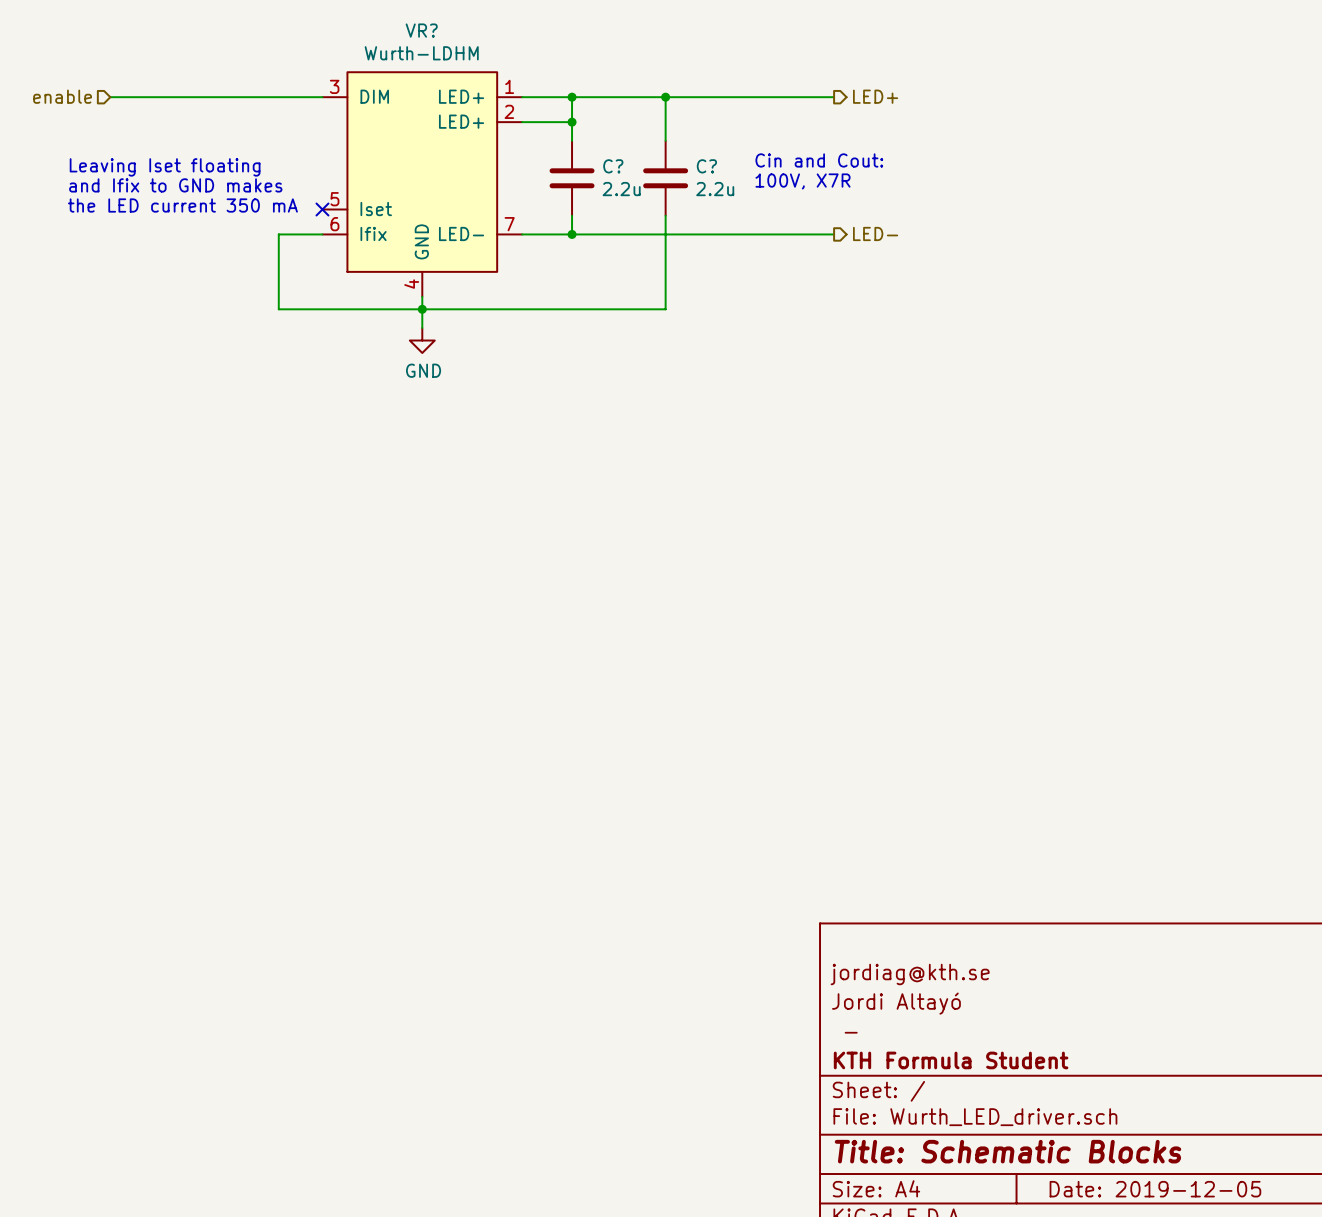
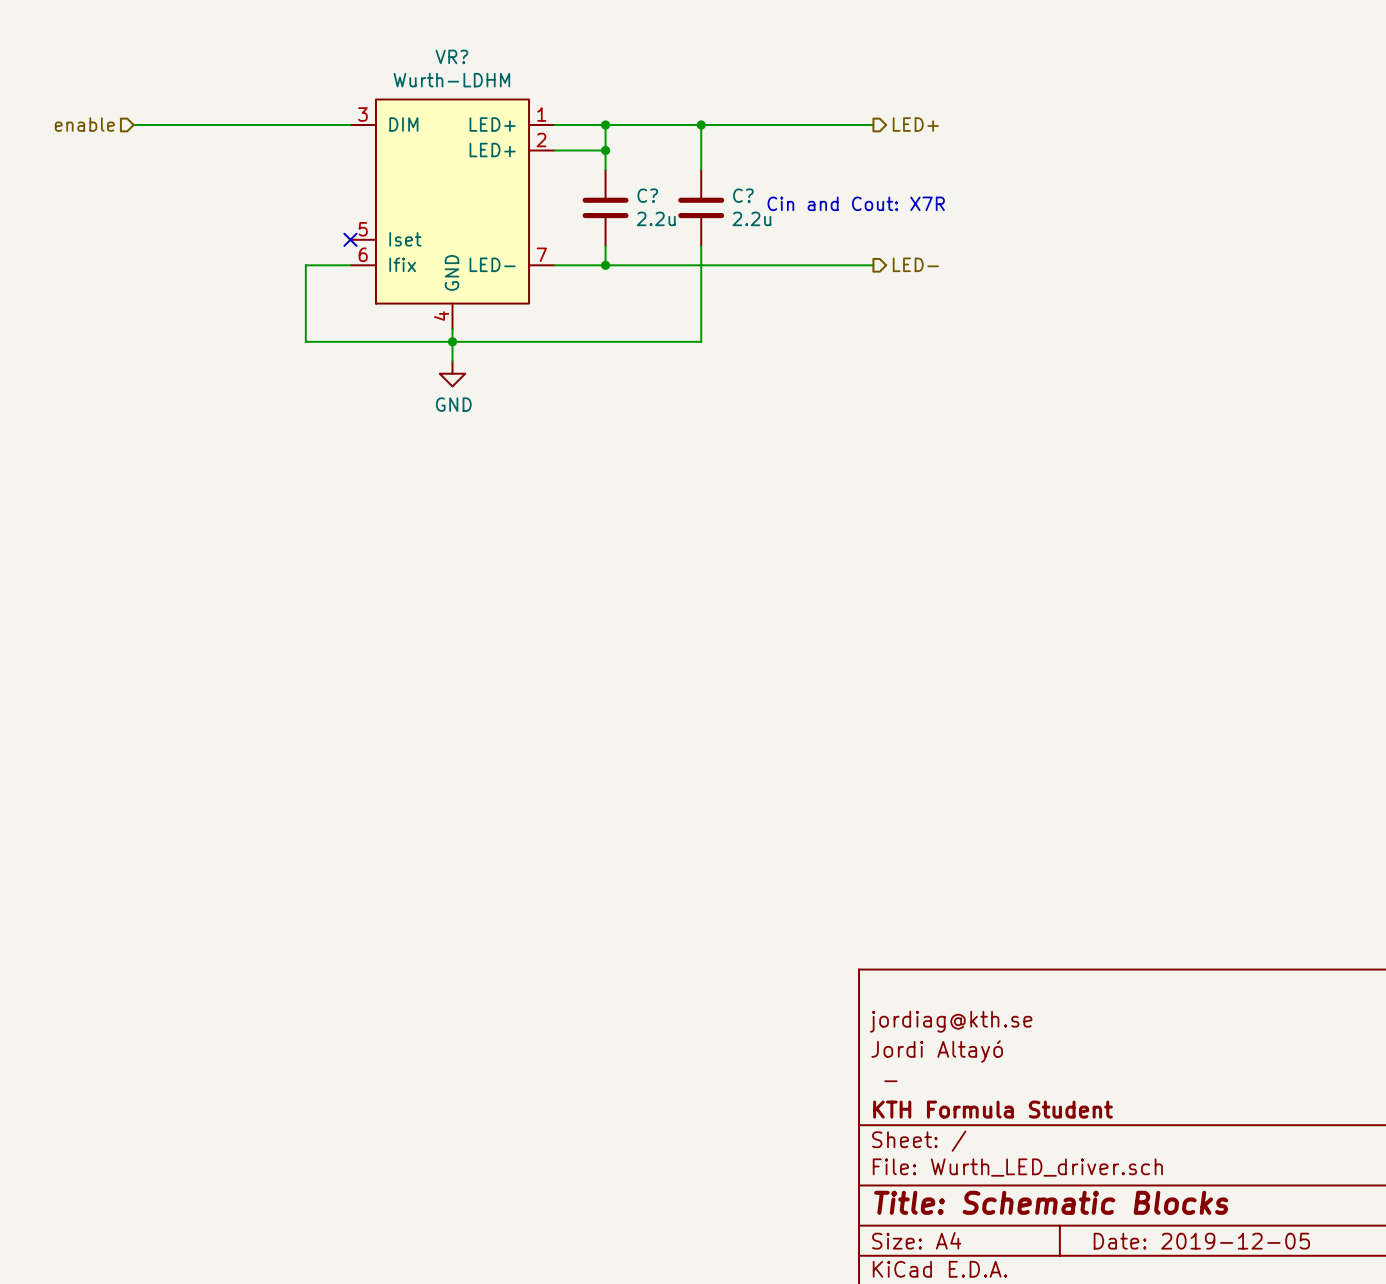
text: Cin and Cout: (819, 160) -> Cin and Cout: X7R (856, 203)
text: Leaving Iset floating (165, 167) -> none
text: 100V, X7R (802, 181) -> none
text: and Ifix to GND makes (175, 185) -> none
text: the LED current 350 mA (182, 205) -> none

